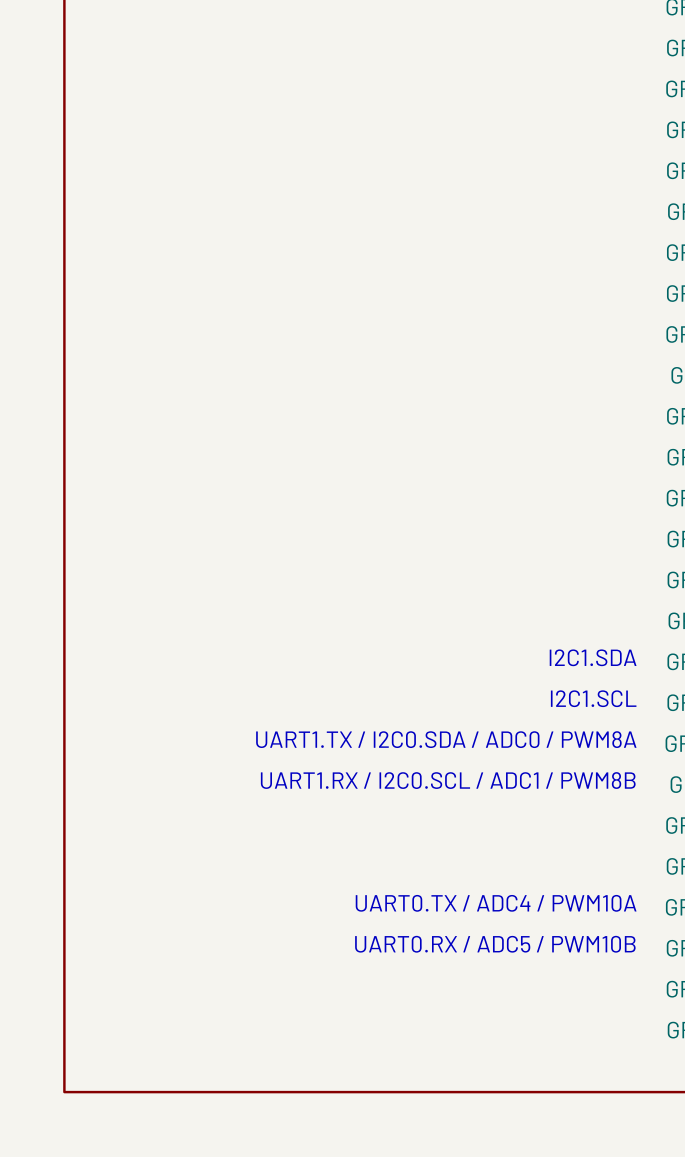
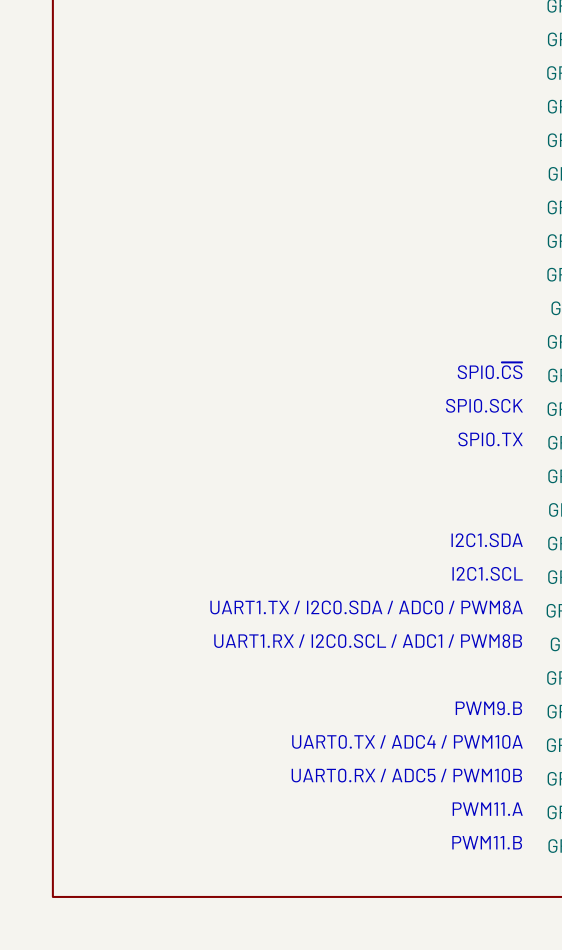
text: none -> SPI0.~{CS} (490, 370)
text: none -> SPI0.SCK (484, 405)
text: none -> SPI0.TX (490, 439)
text: none -> PWM9.B (488, 708)
text: none -> PWM11.A (487, 809)
text: none -> PWM11.B (487, 842)

